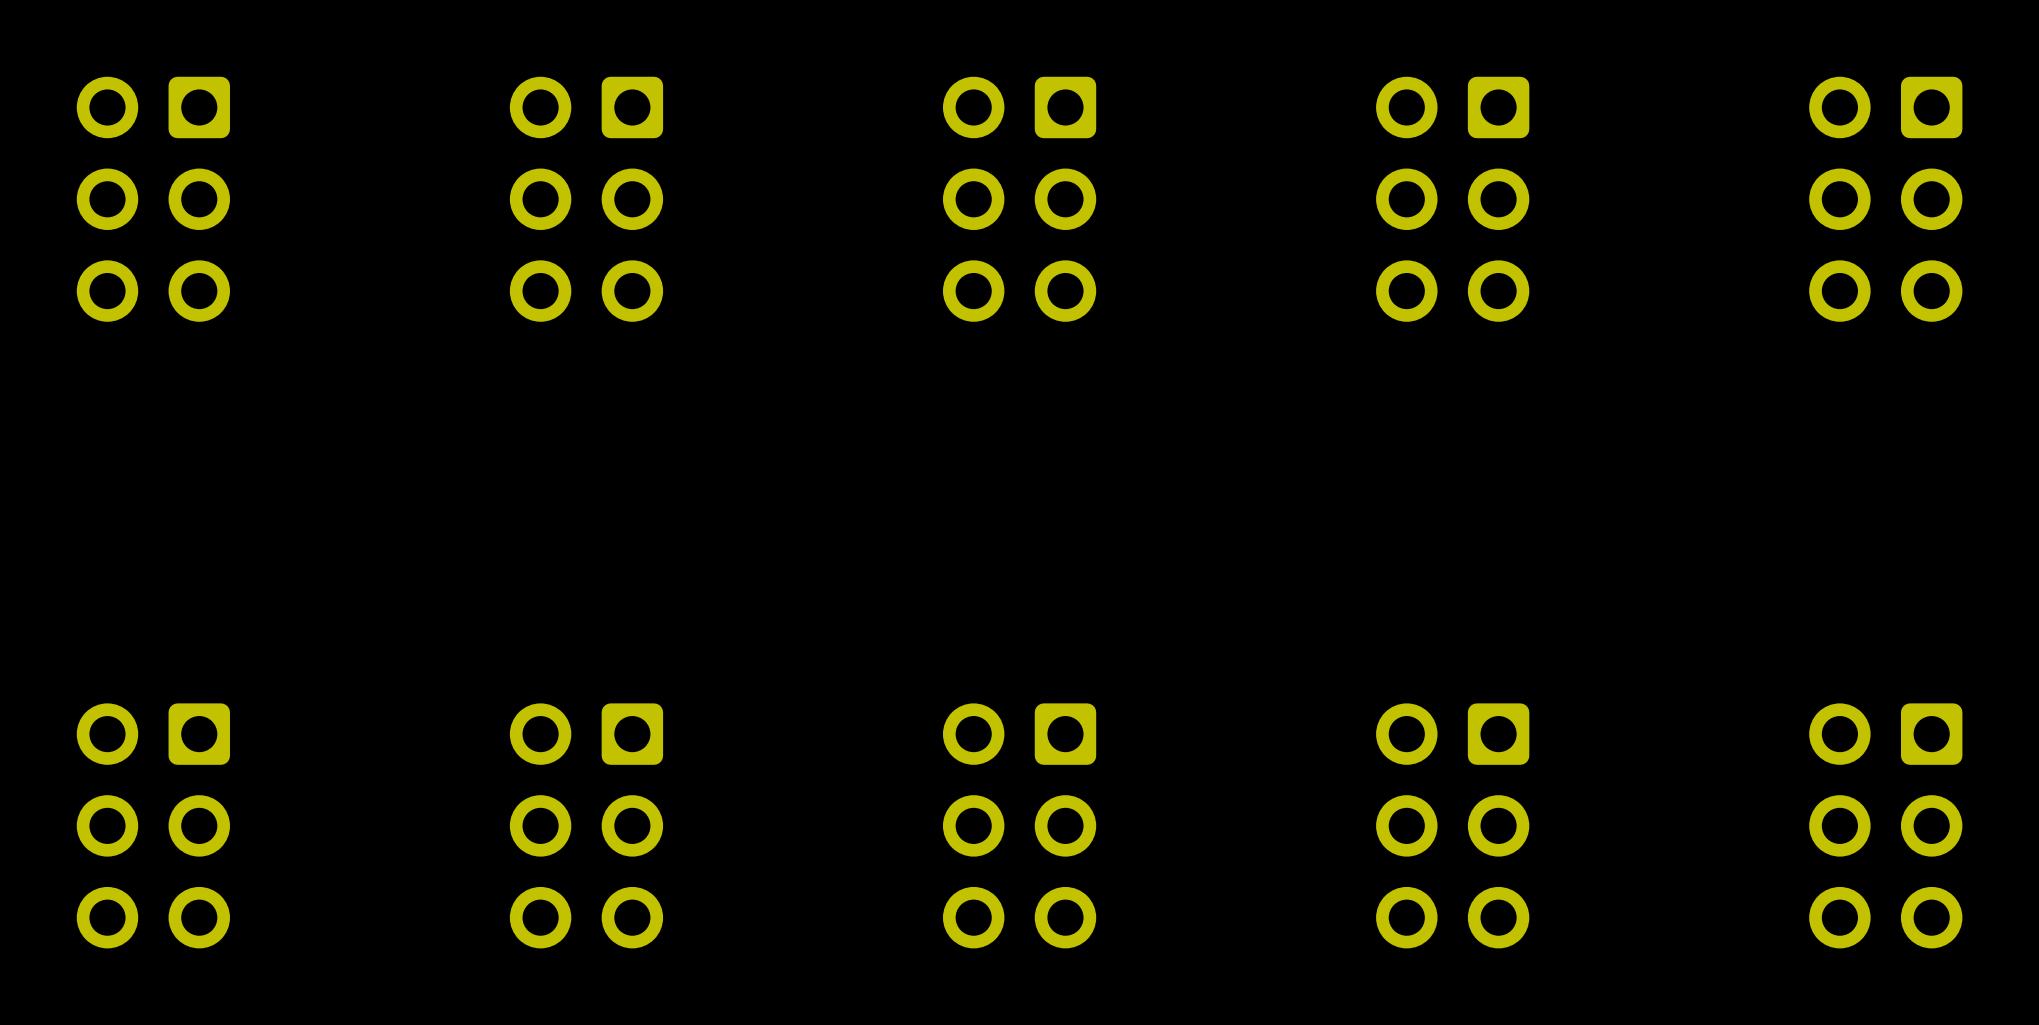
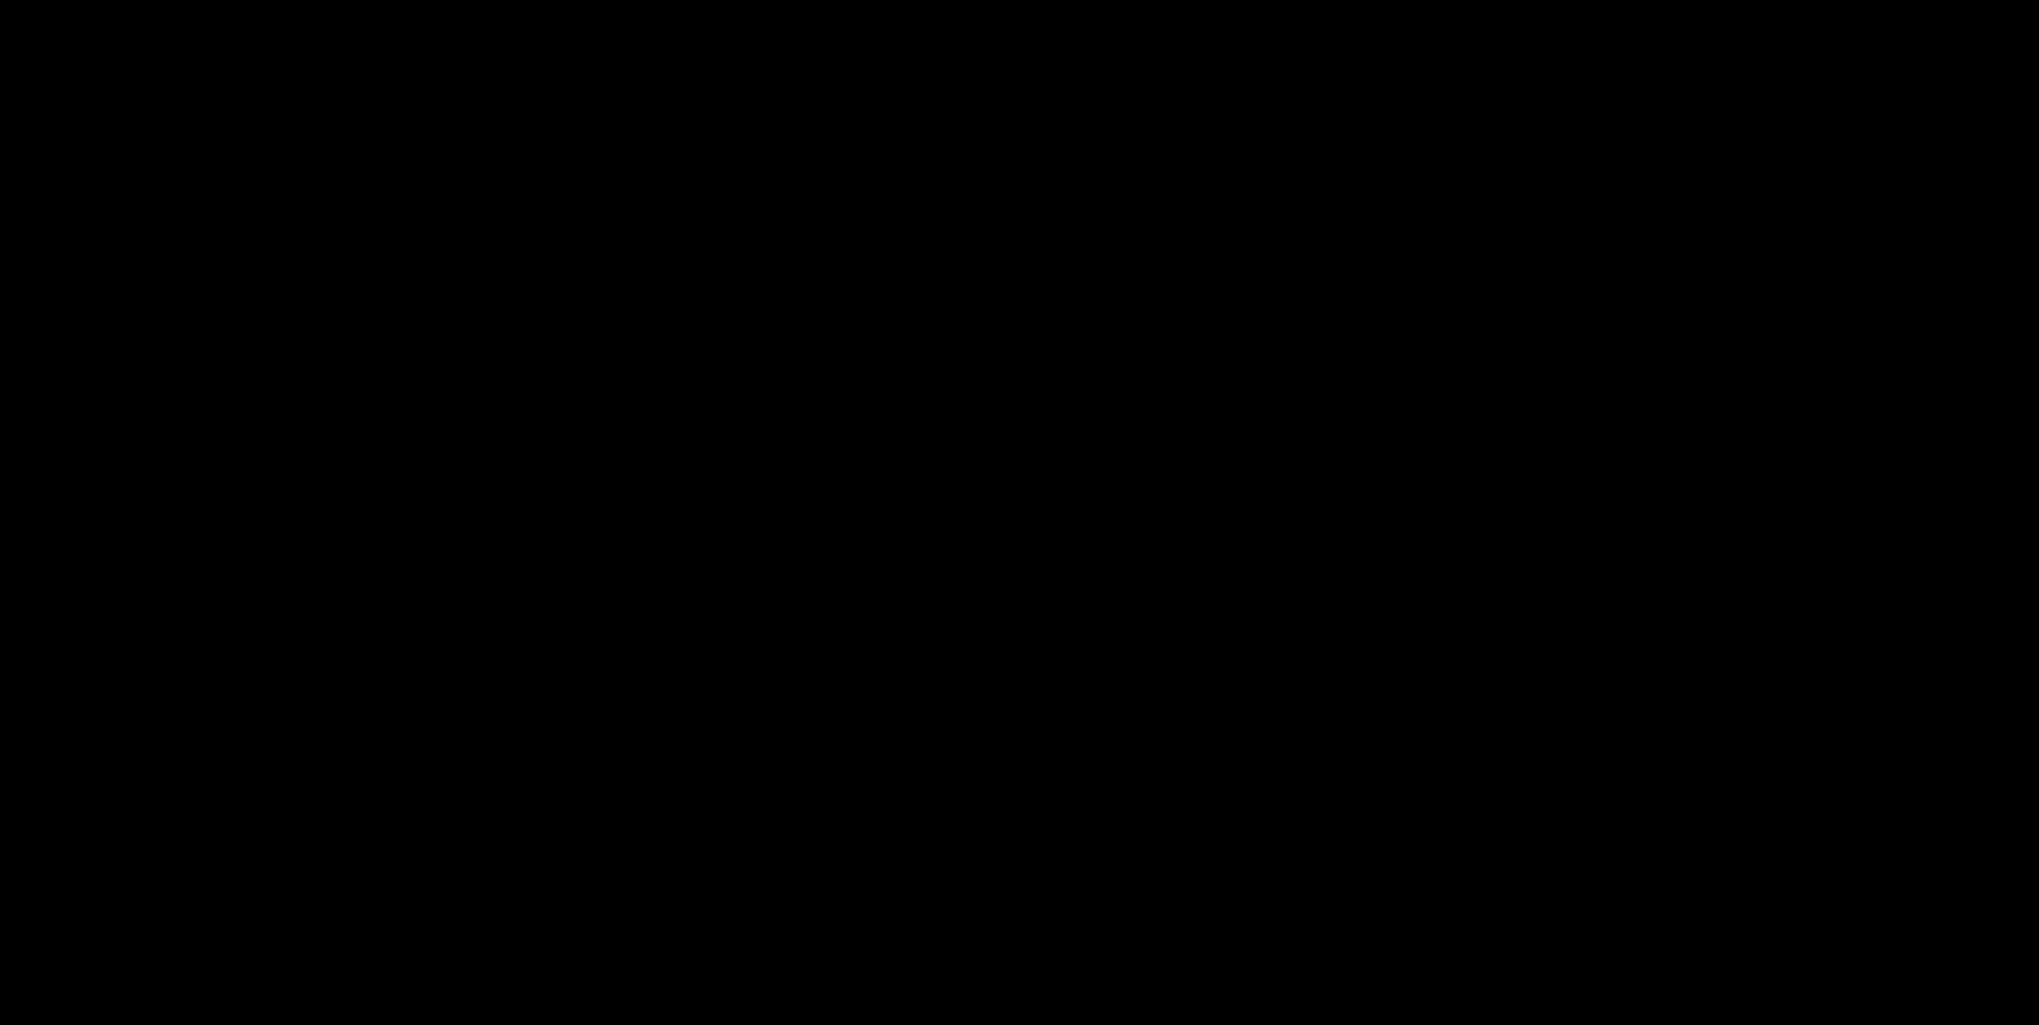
part: (153, 199) -> none
part: (586, 199) -> none
part: (1019, 199) -> none
part: (1452, 199) -> none
part: (1885, 199) -> none
part: (153, 825) -> none
part: (586, 825) -> none
part: (1019, 825) -> none
part: (1452, 825) -> none
part: (1885, 825) -> none

